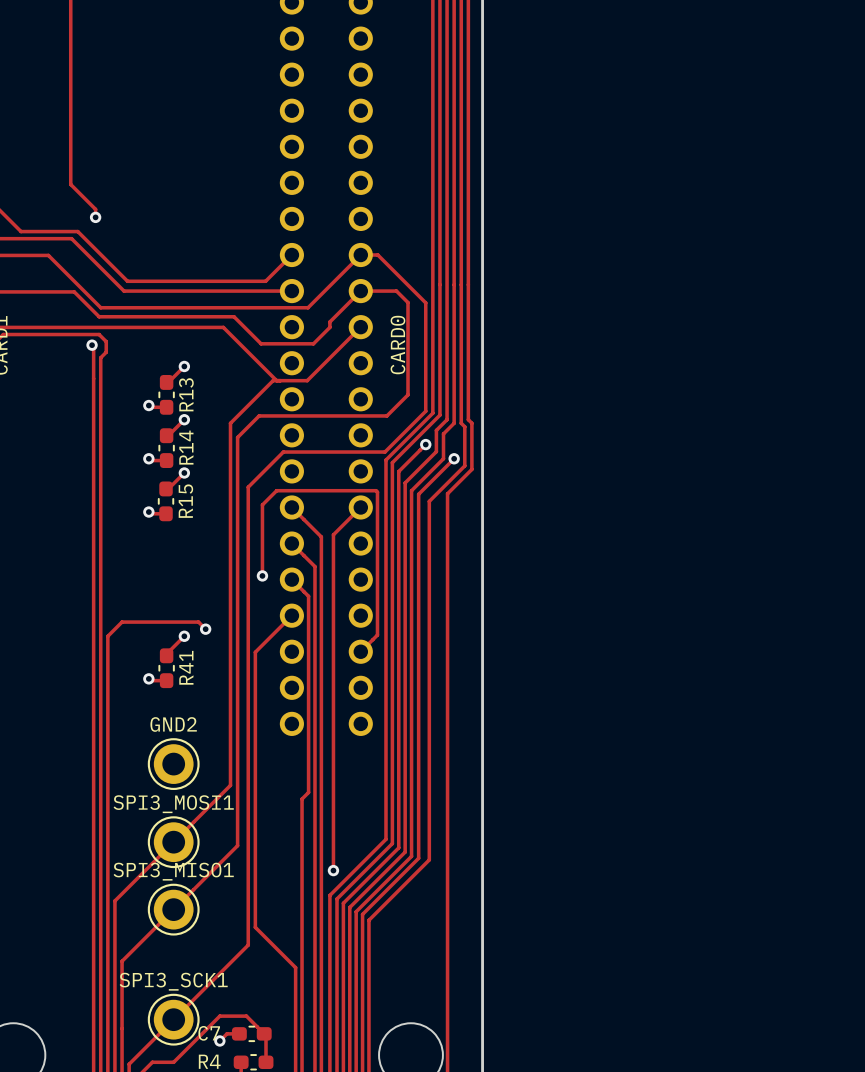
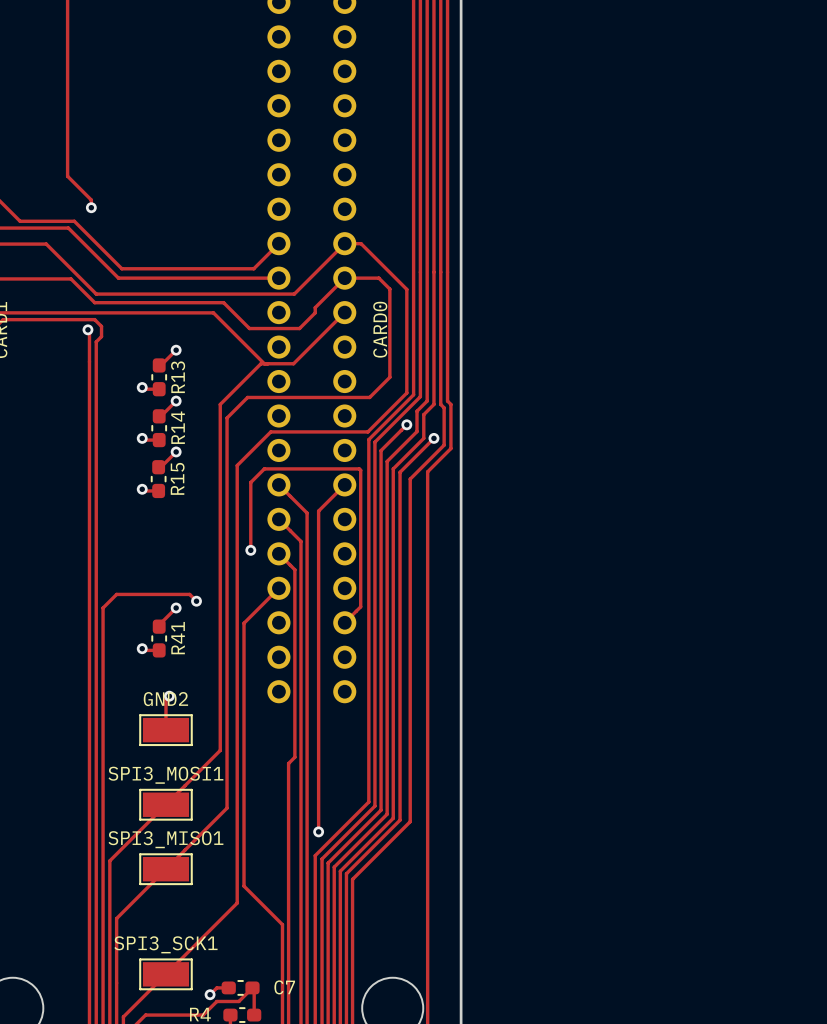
track: none -> (169, 696) (165, 699) (165, 730)
via: none -> (169, 696)
GND2 footprint: [147, 738, 200, 790] -> [139, 714, 193, 747]
SPI3_MOSI1 footprint: [147, 816, 200, 869] -> [139, 788, 193, 821]
SPI3_MISO1 footprint: [147, 883, 200, 936] -> [139, 853, 193, 886]
SPI3_SCK1 footprint: [147, 993, 200, 1046] -> [139, 958, 193, 991]
C7 name position: C7 (209, 1033) -> C7 (284, 987)
track: (264, 1033) (246, 1016) (219, 1016) (173, 1062) -> (252, 987) (238, 1001) (216, 1001) (203, 1015) (165, 1015)

